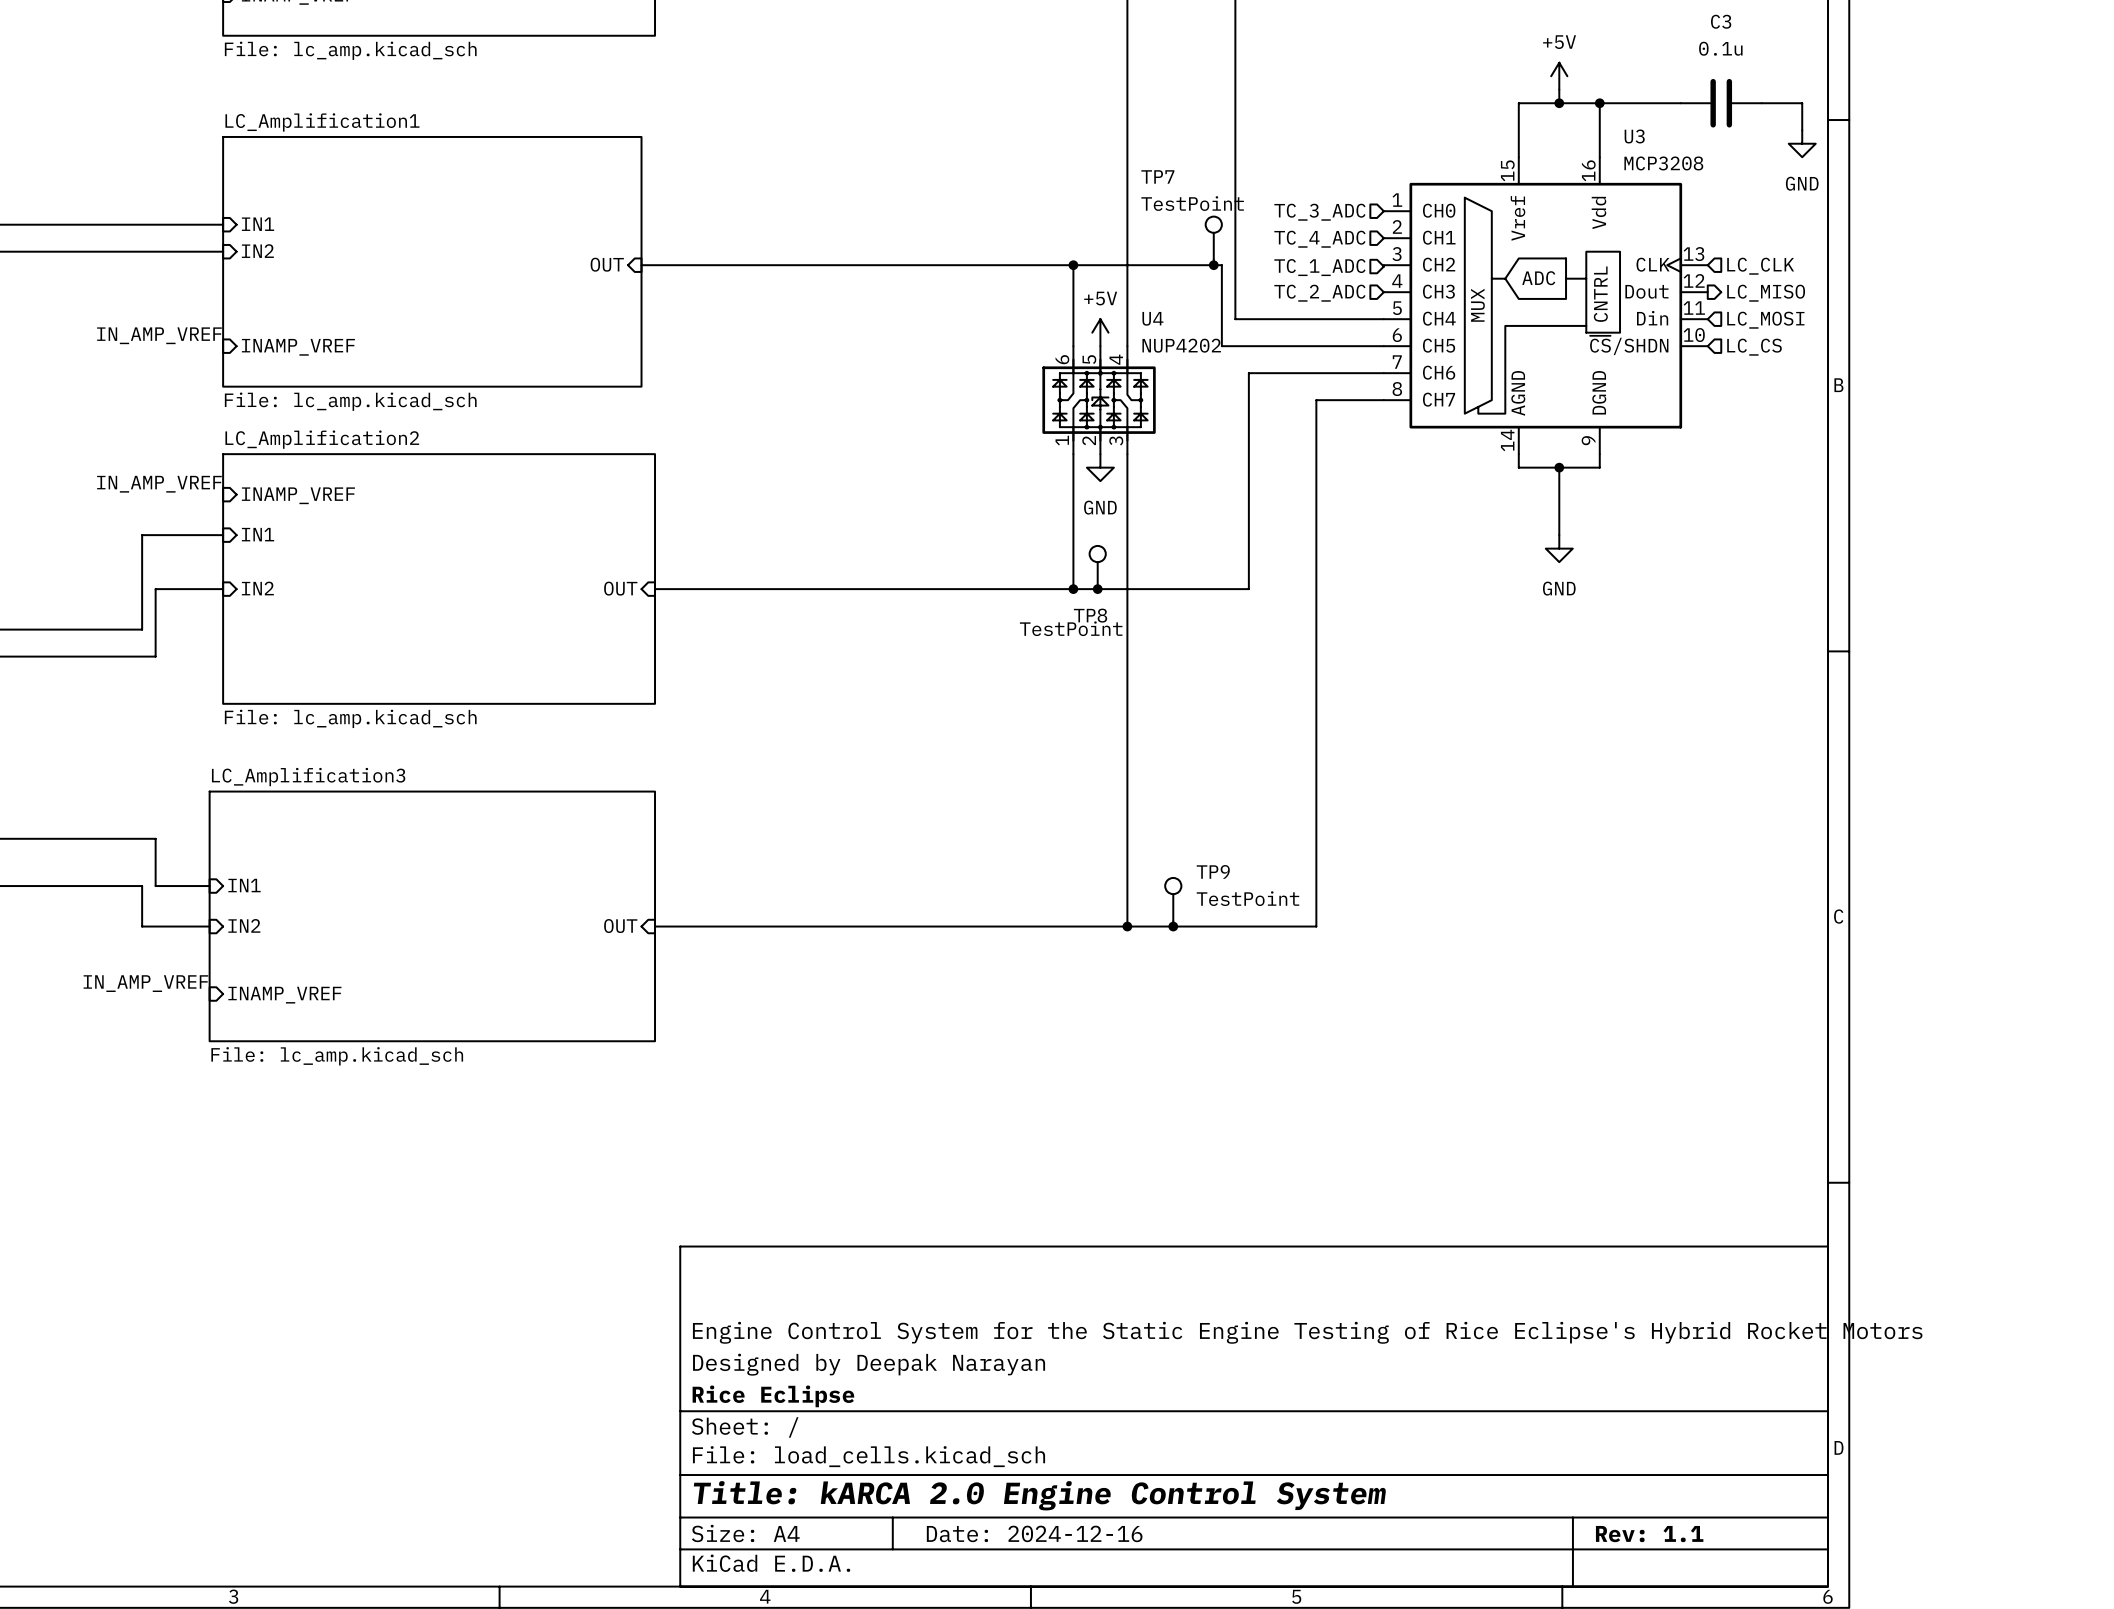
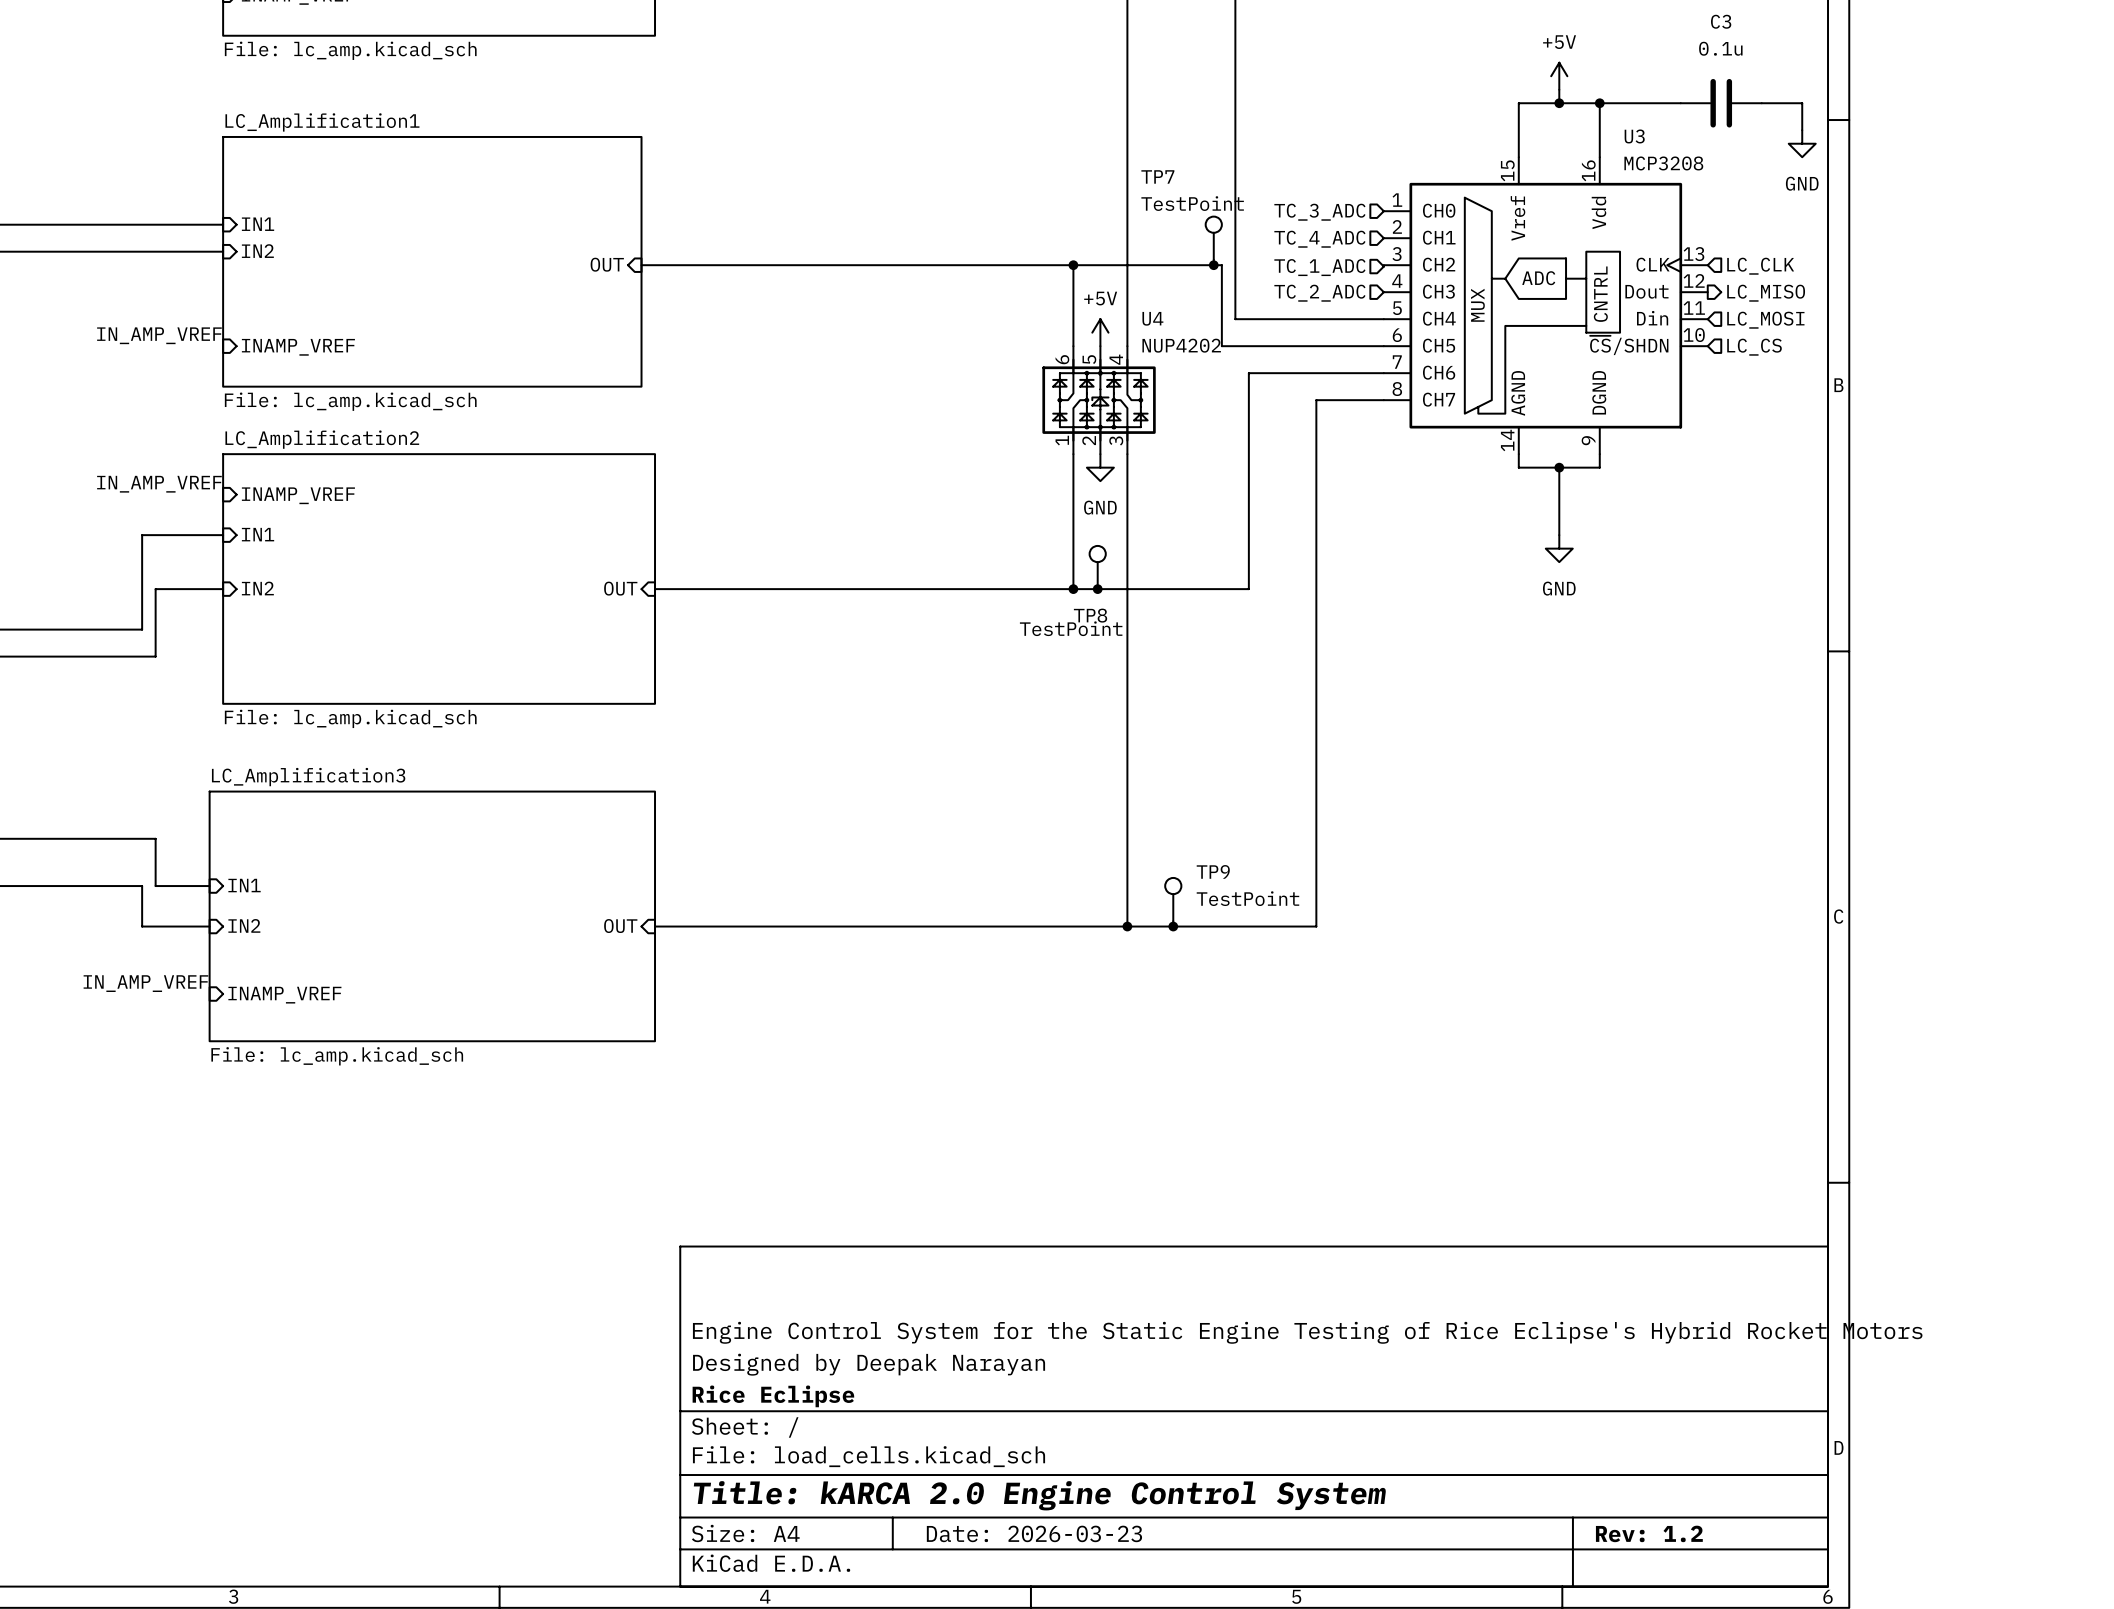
title block: Date: 2024-12-16 (1034, 1533) -> Date: 2026-03-23 (1034, 1533)
title block: Rev: 1.1 (1649, 1534) -> Rev: 1.2 (1649, 1533)

